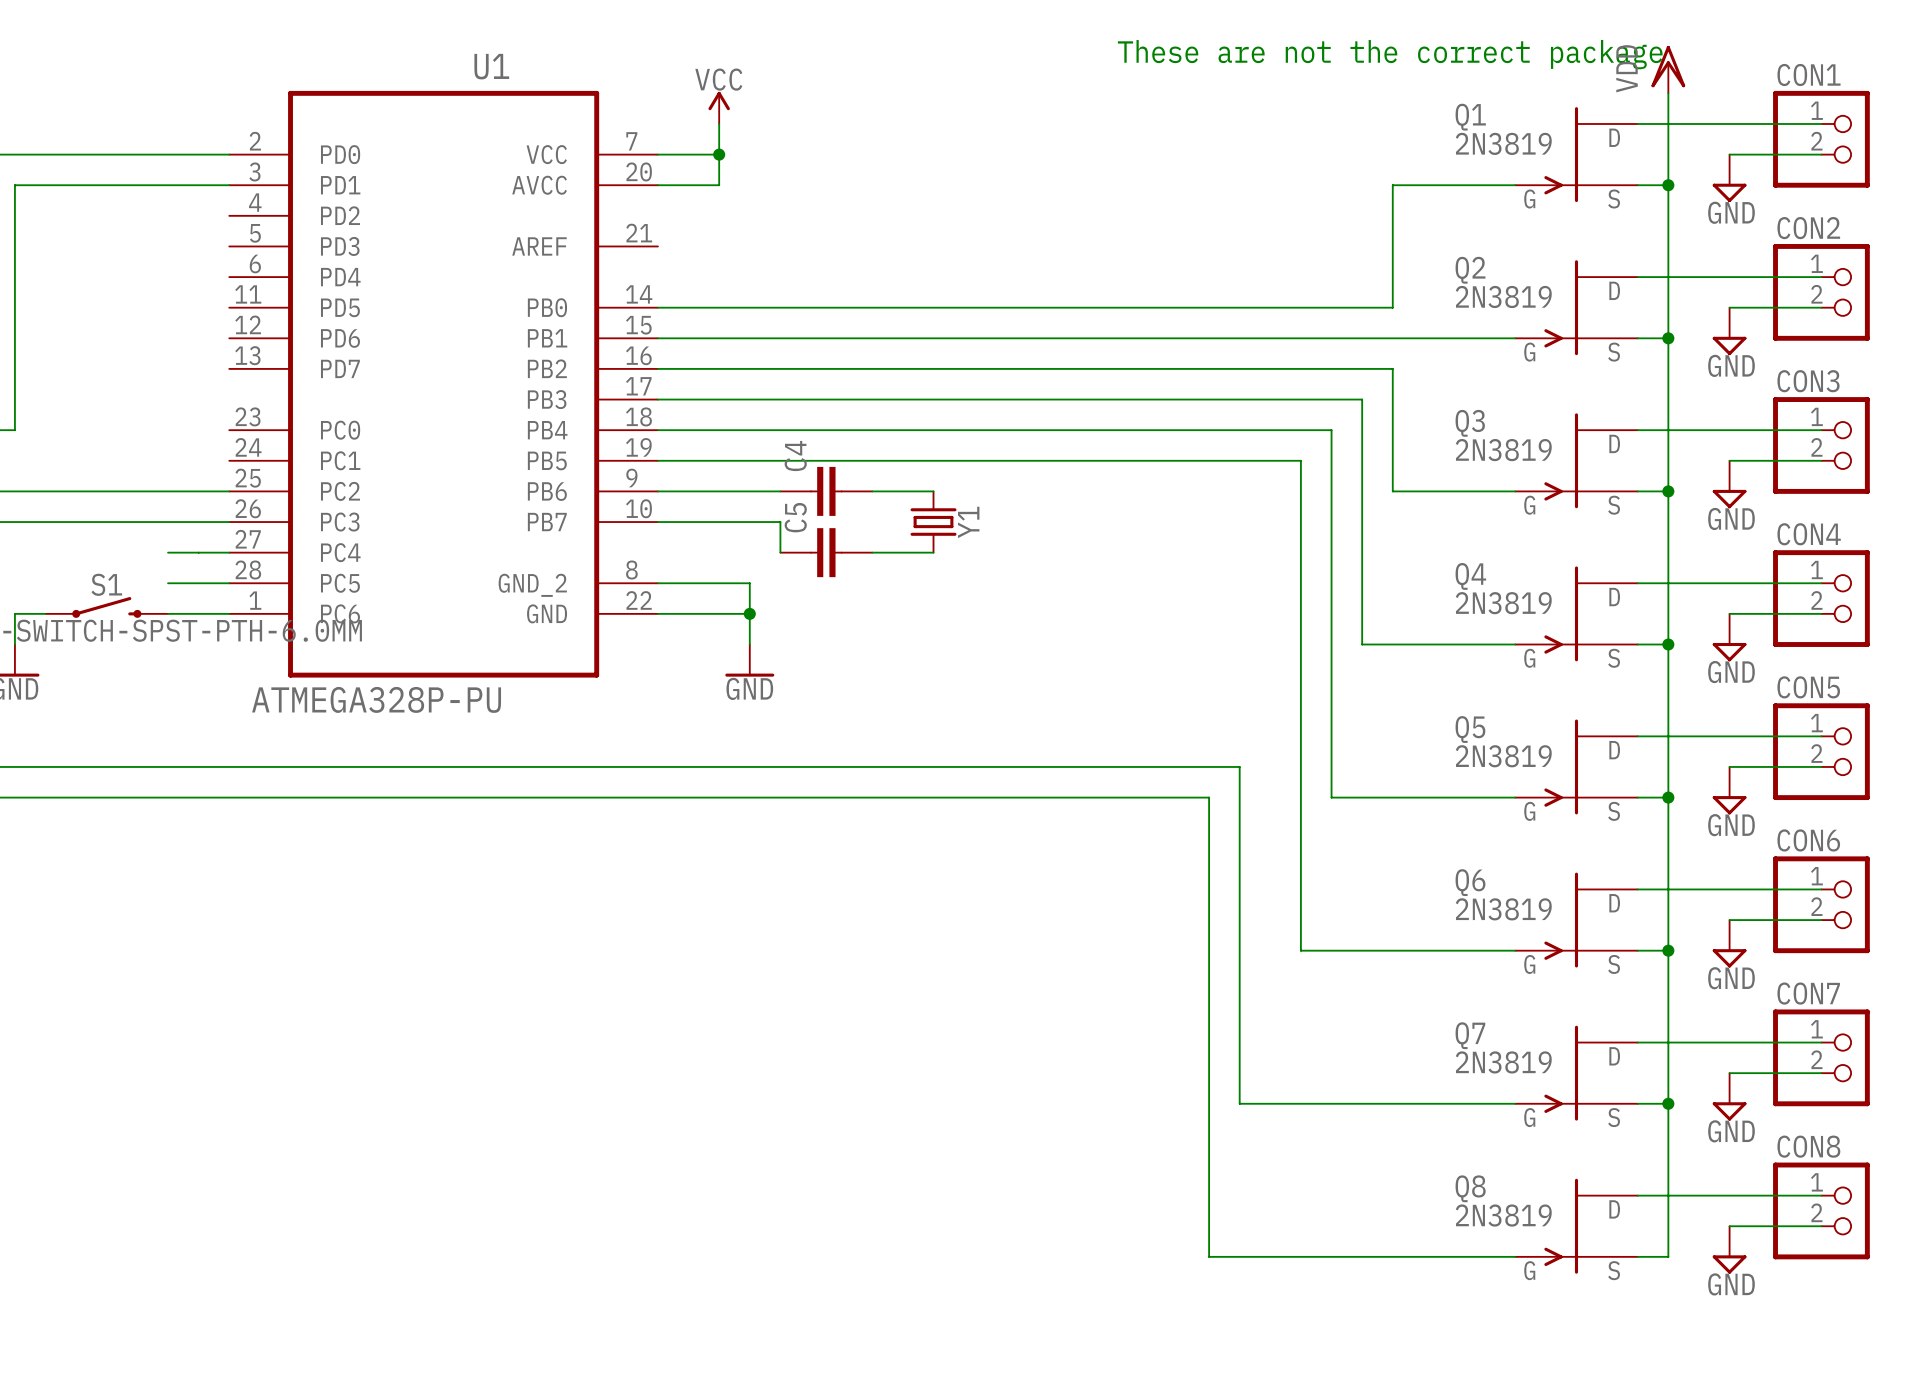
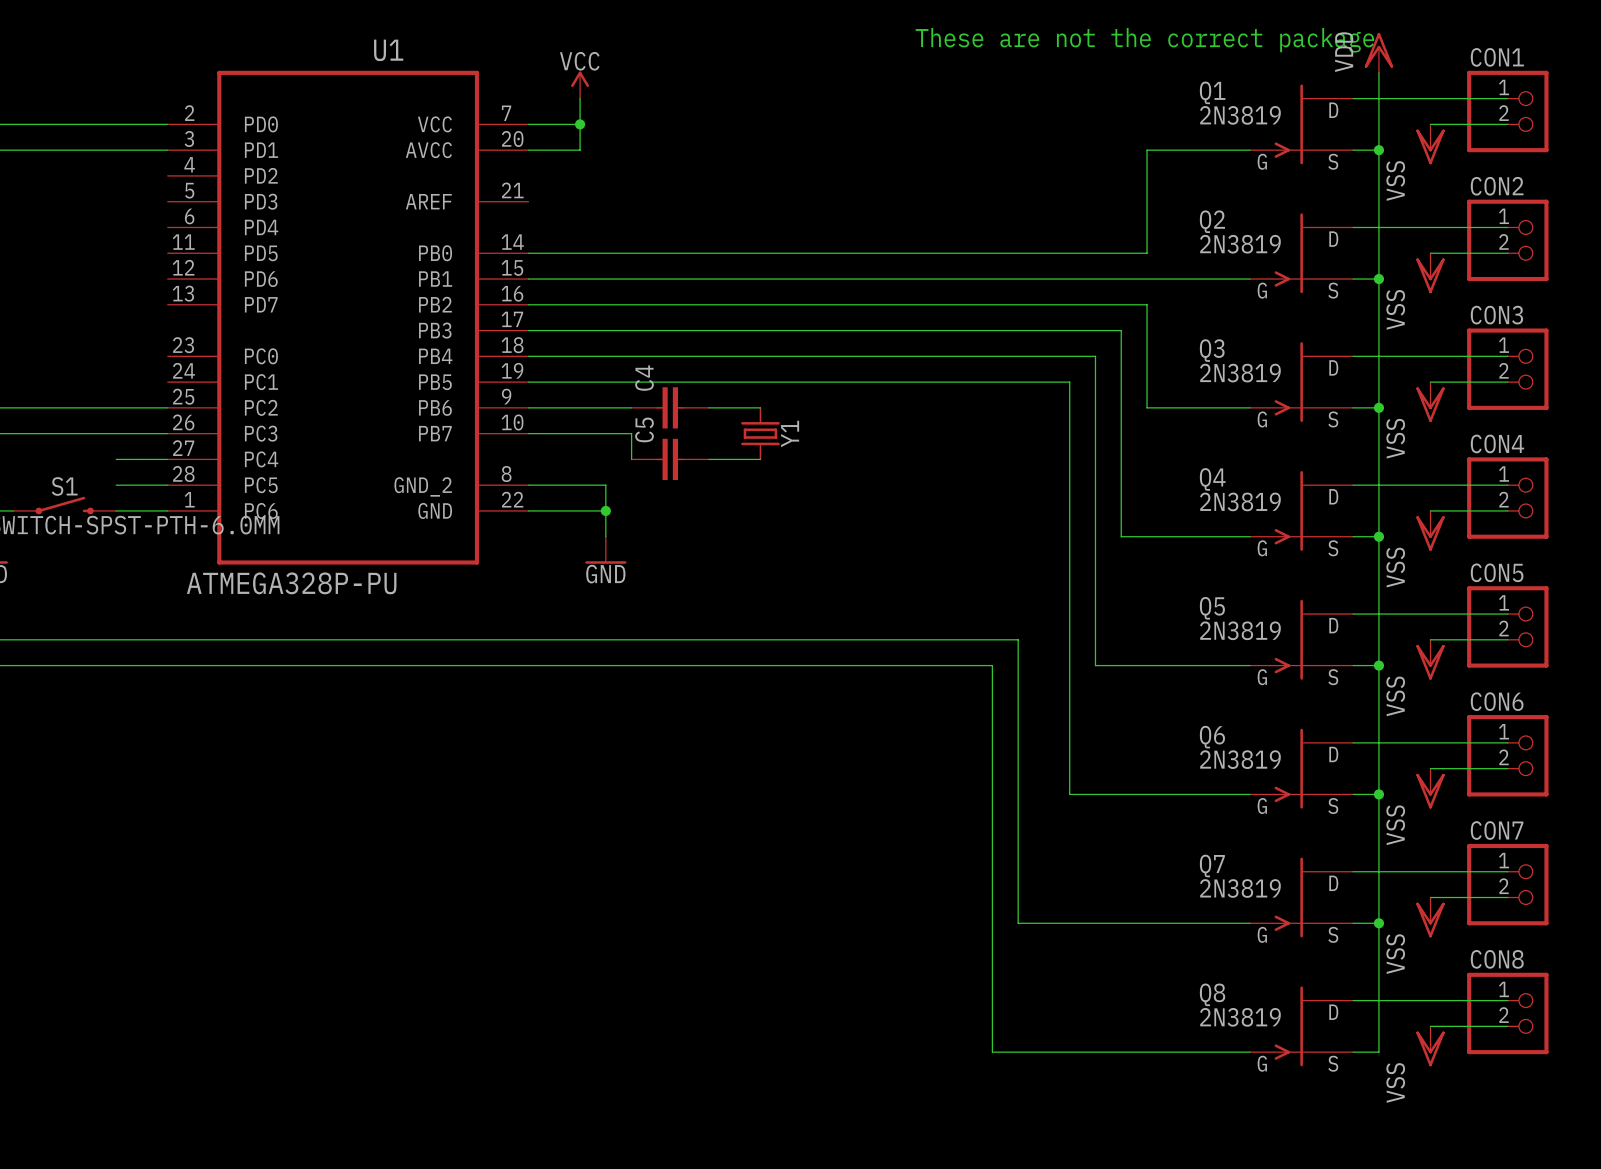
power symbol: GND (1729, 178) -> VSS (1430, 144)
power symbol: GND (1729, 331) -> VSS (1430, 273)
power symbol: GND (1729, 484) -> VSS (1430, 402)
power symbol: GND (1729, 637) -> VSS (1430, 530)
power symbol: GND (1729, 790) -> VSS (1430, 659)
power symbol: GND (1729, 943) -> VSS (1430, 788)
power symbol: GND (1729, 1096) -> VSS (1430, 917)
power symbol: GND (1729, 1249) -> VSS (1430, 1046)

